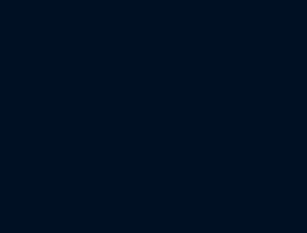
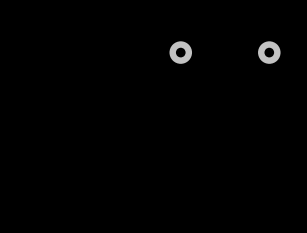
via: none -> (180, 52)
via: none -> (269, 52)

